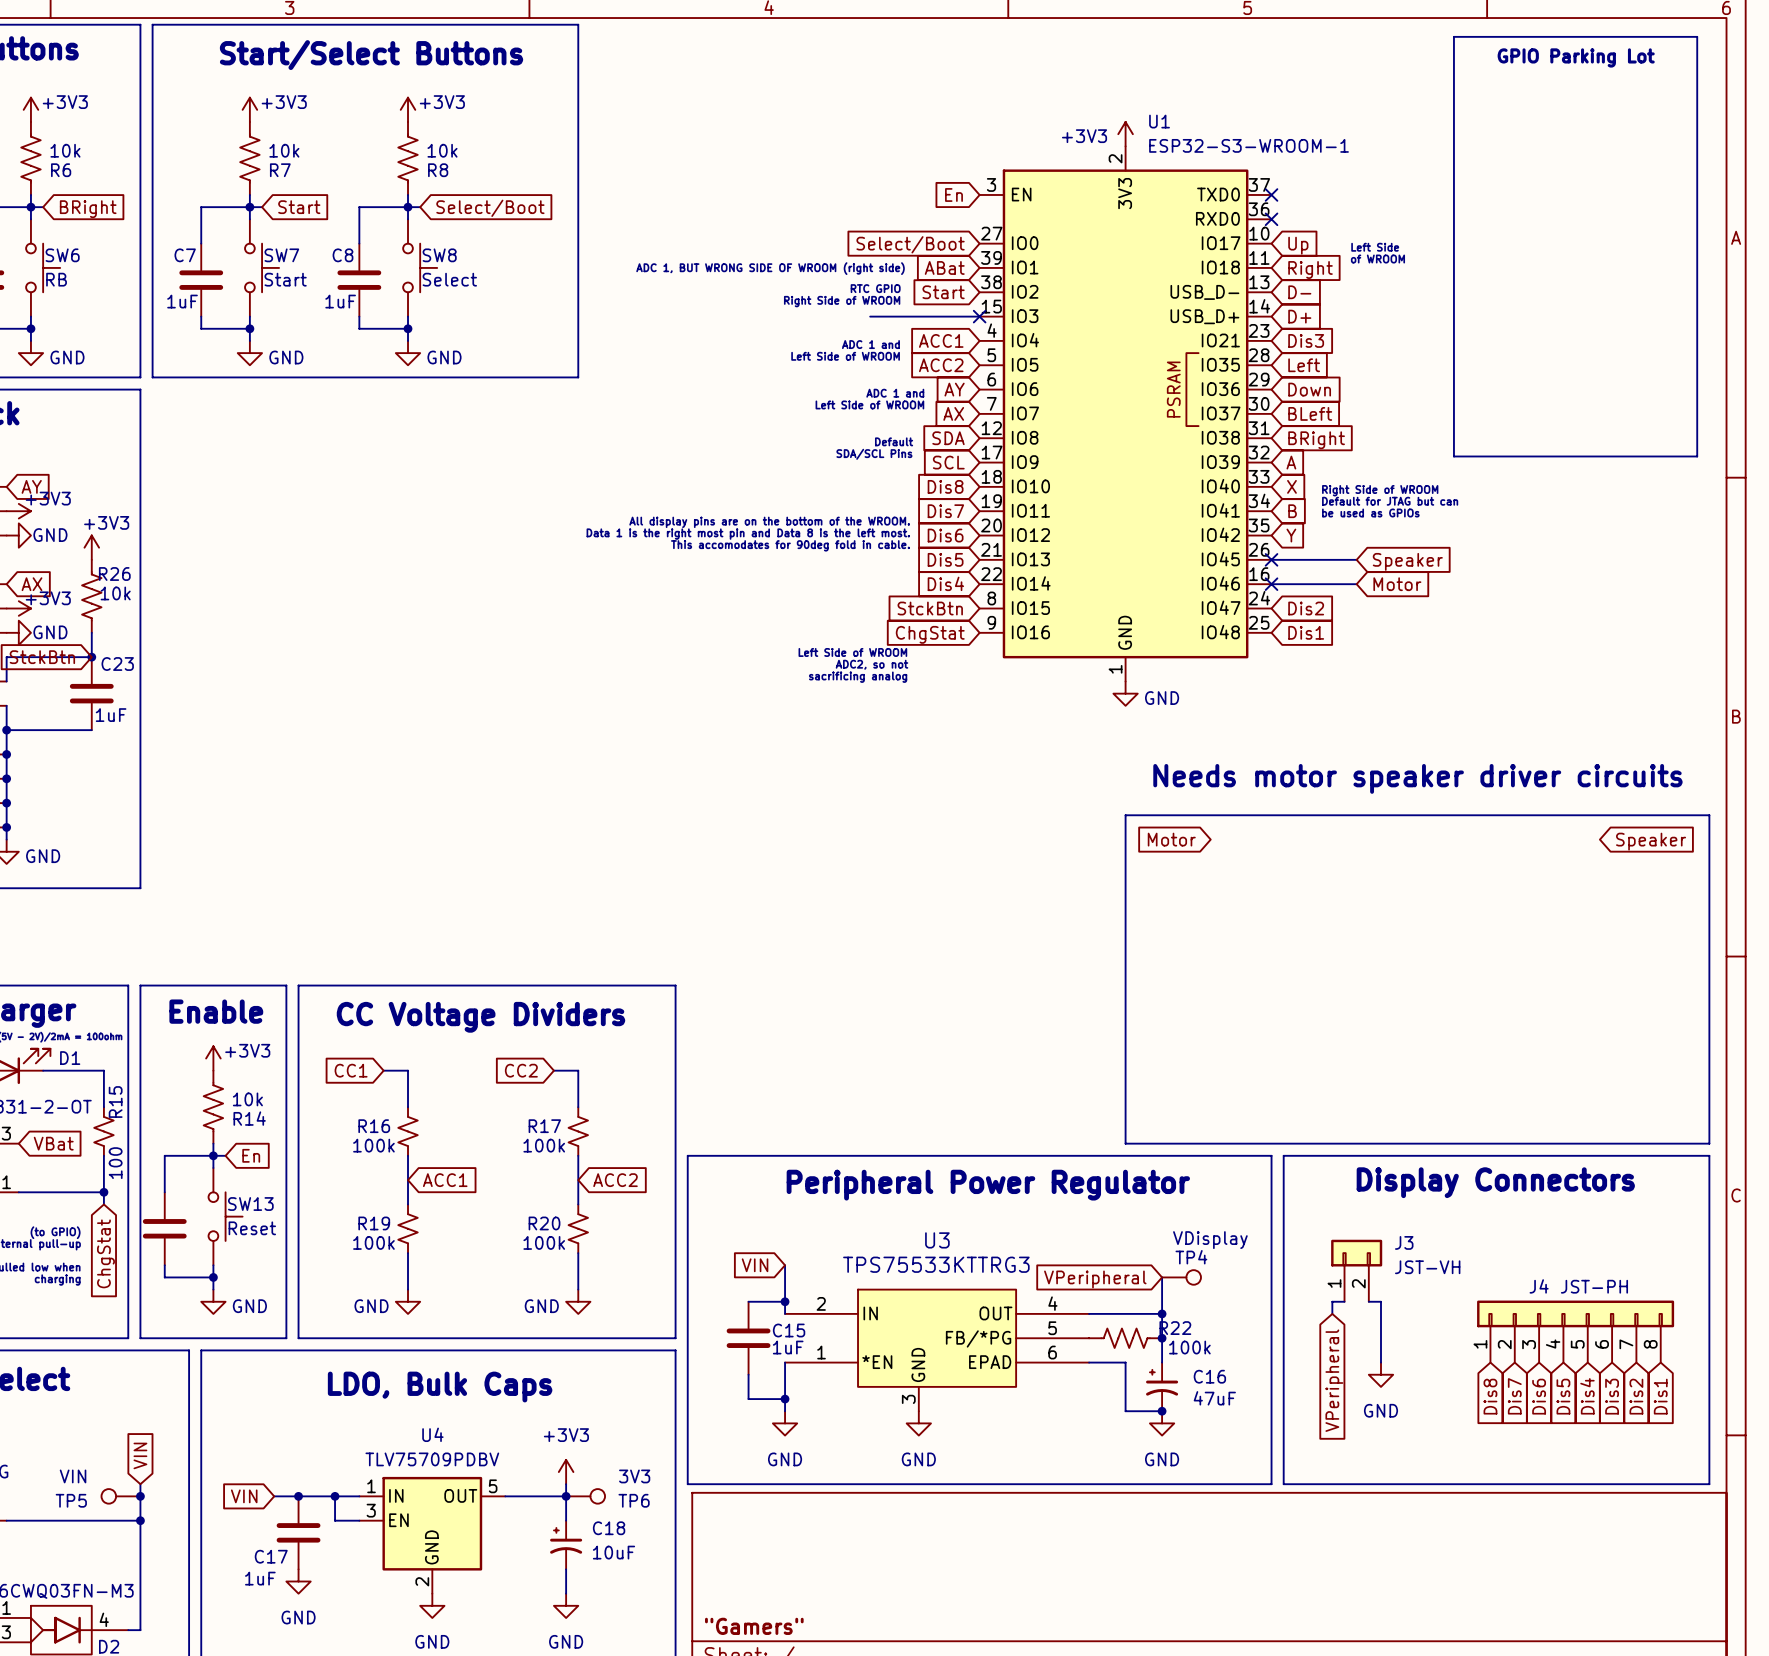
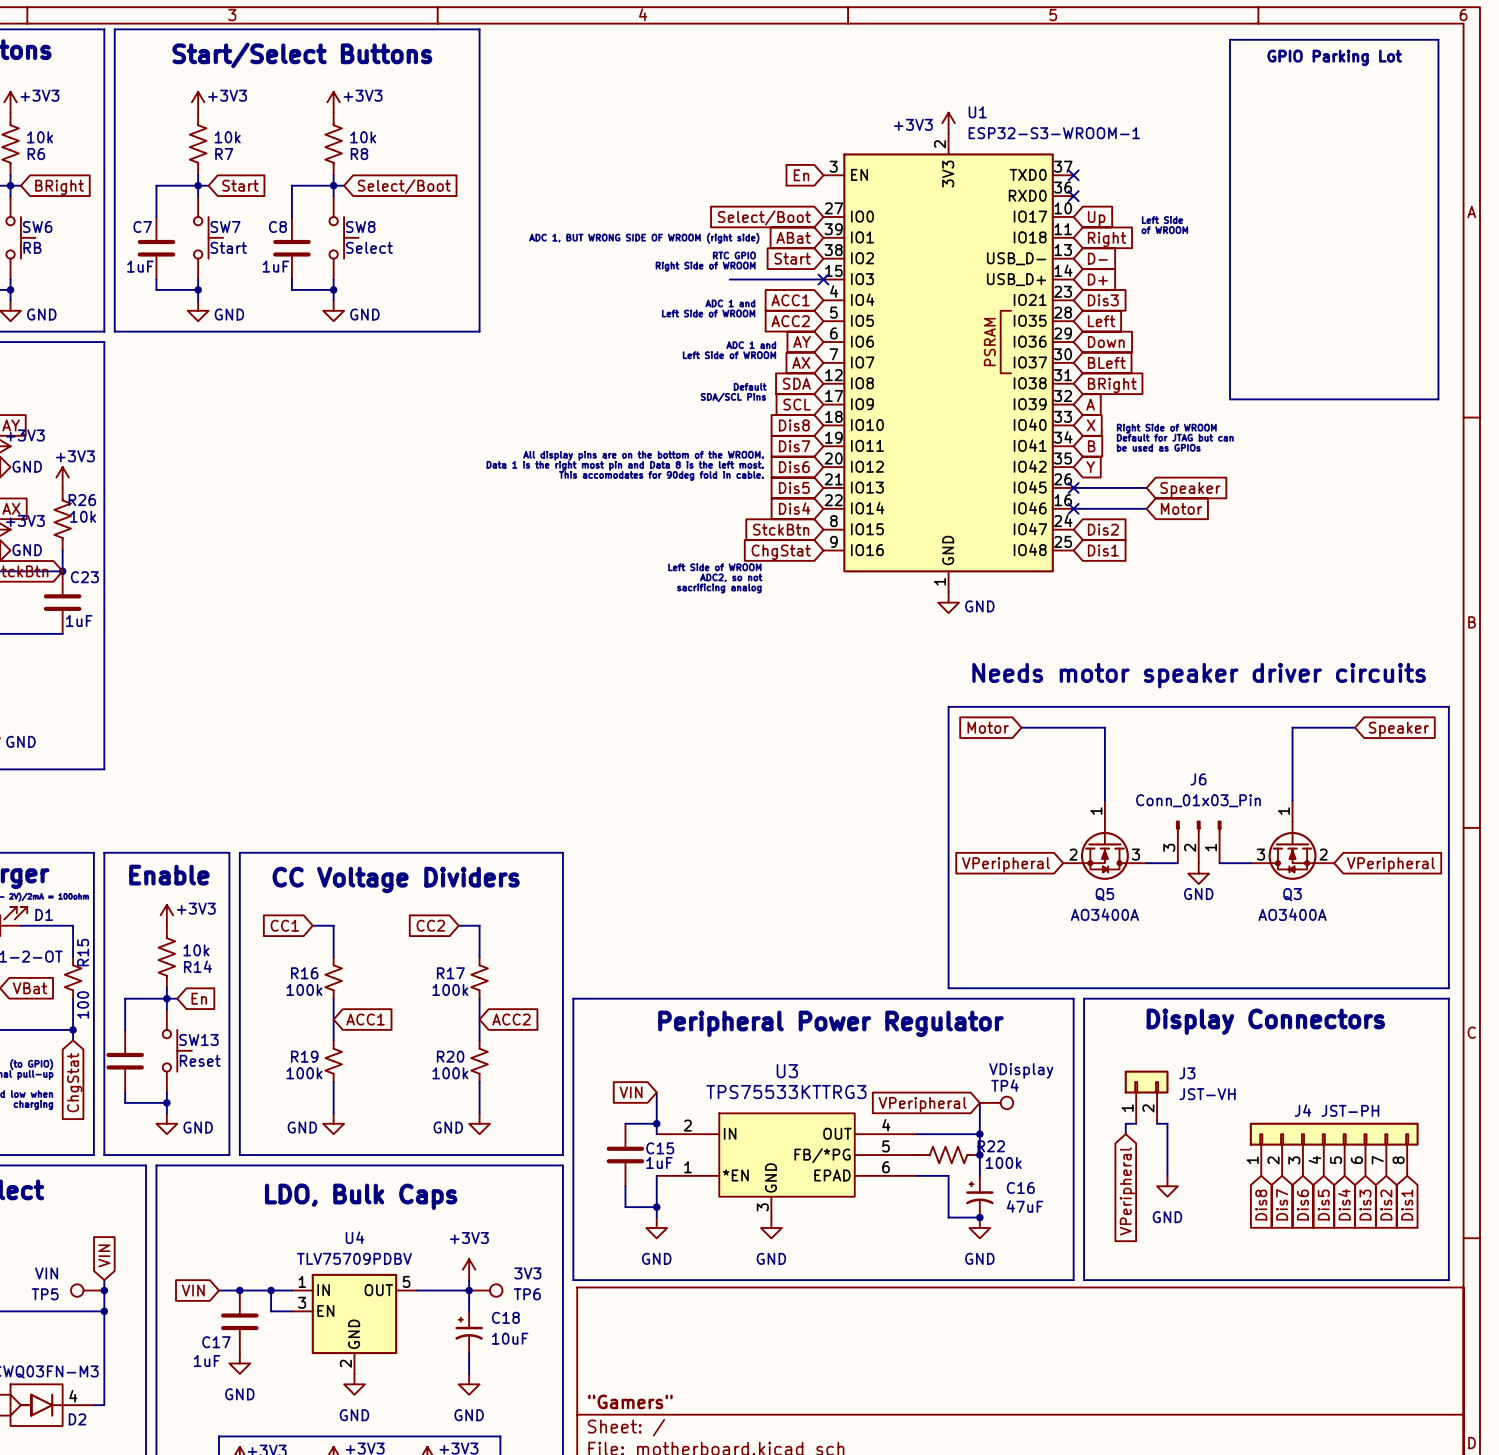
wire: none -> (1021, 727) (1104, 727) (1104, 800)
wire: none -> (1355, 727) (1292, 727) (1292, 800)
Q5: none -> AO3400A (1104, 840)
Q3: none -> AO3400A (1292, 840)
J6: none -> Conn_01x03_Pin (1198, 842)
wire: none -> (1146, 863) (1177, 863)
wire: none -> (1219, 863) (1250, 863)
global label: none -> VPeripheral (1006, 864)
global label: none -> VPeripheral (1390, 864)
power symbol: none -> GND (1198, 873)

